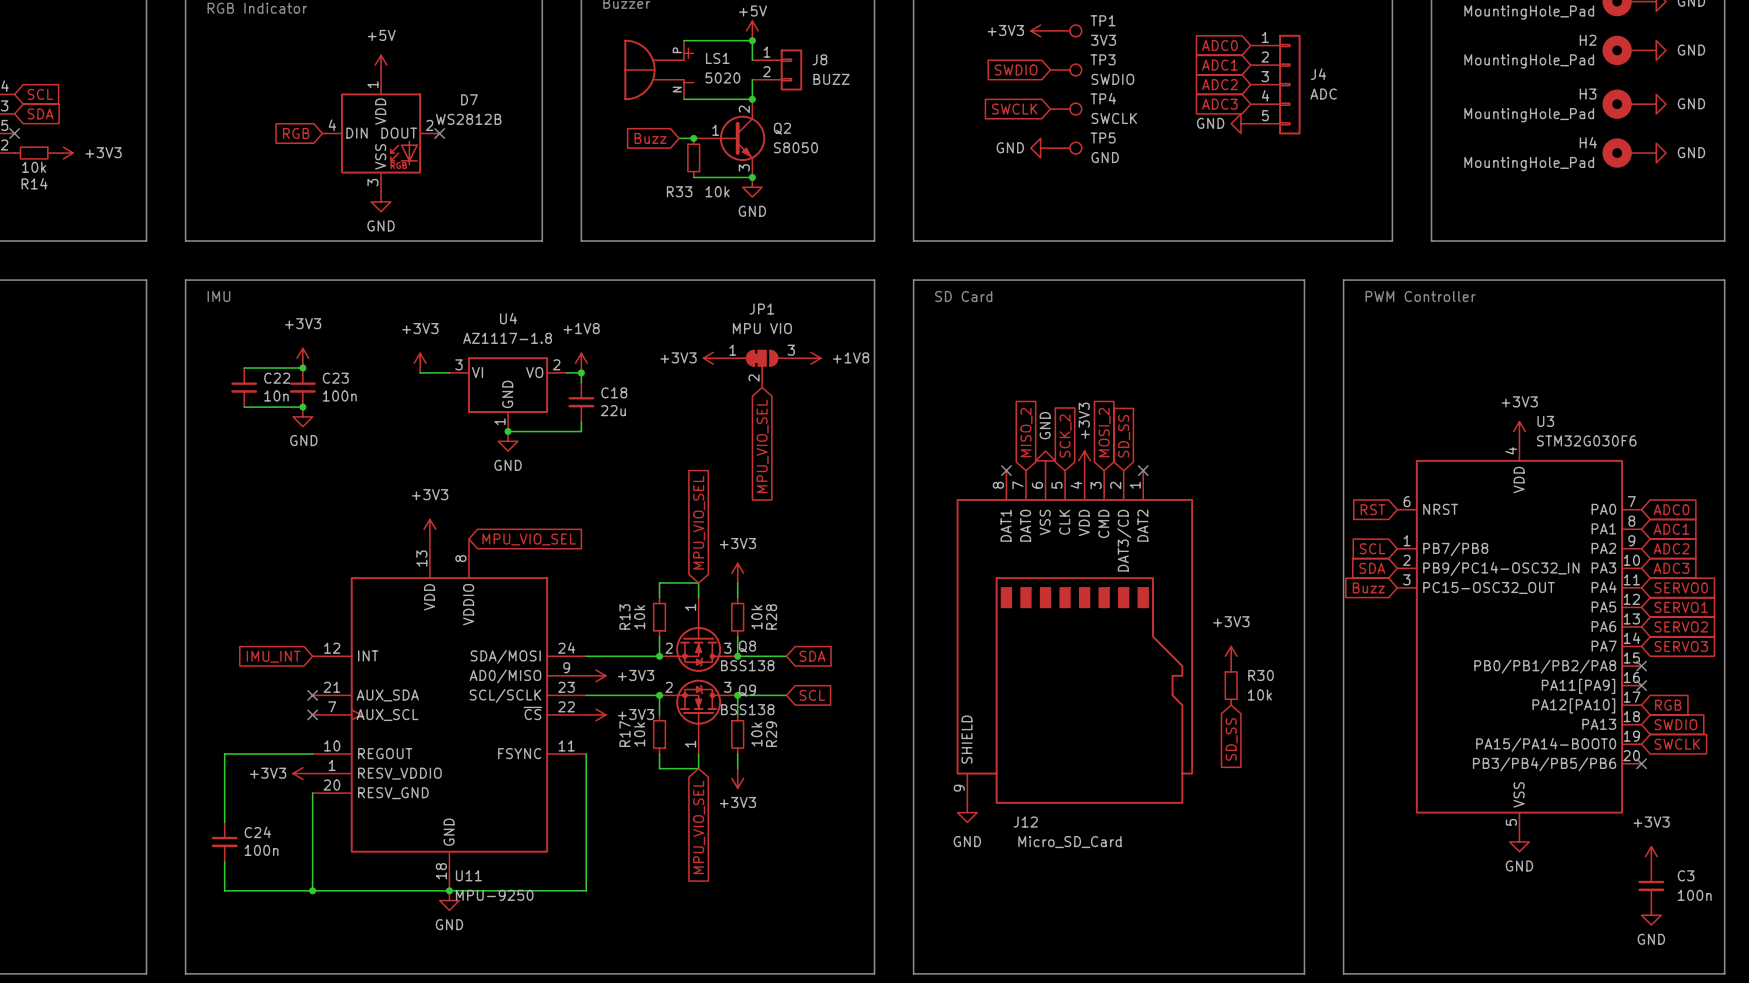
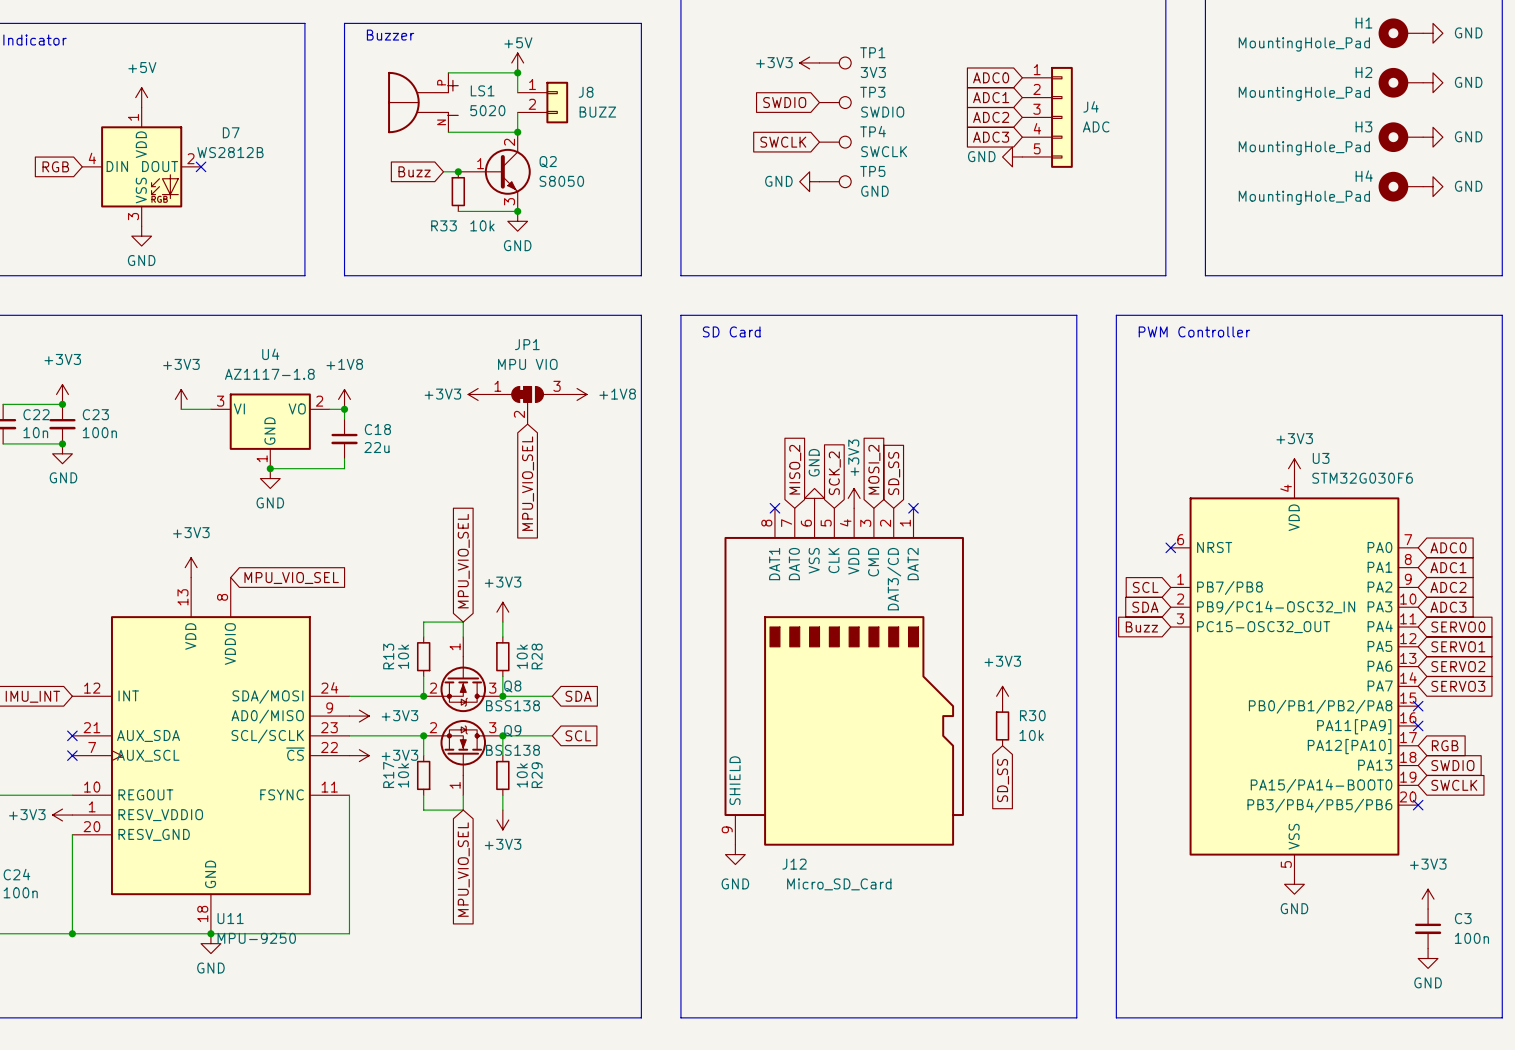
global label: RST (1372, 509) -> none
no-connect mark: none -> (1170, 547)

